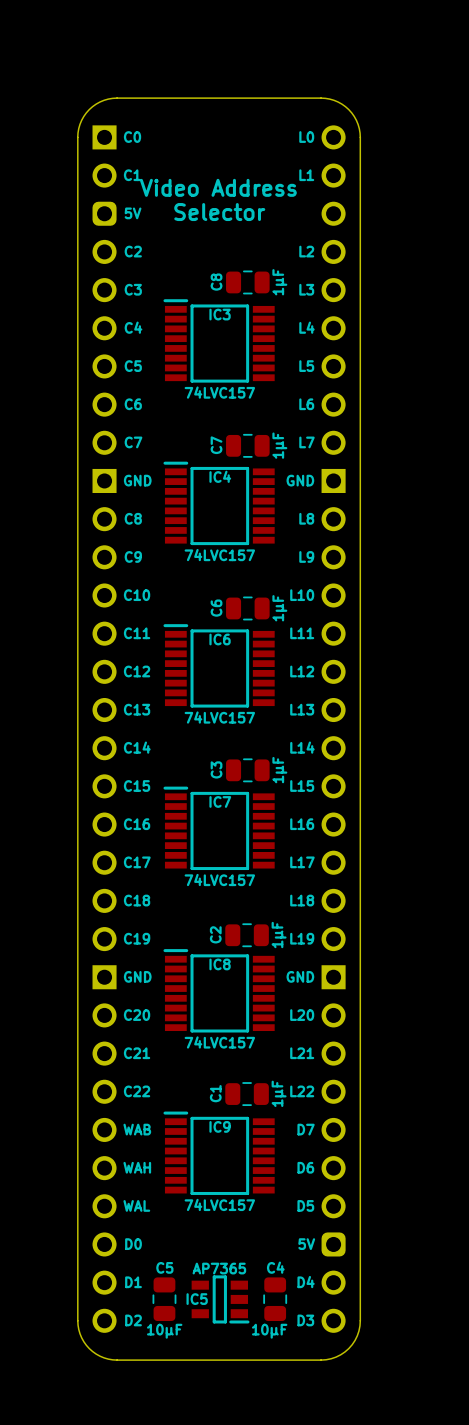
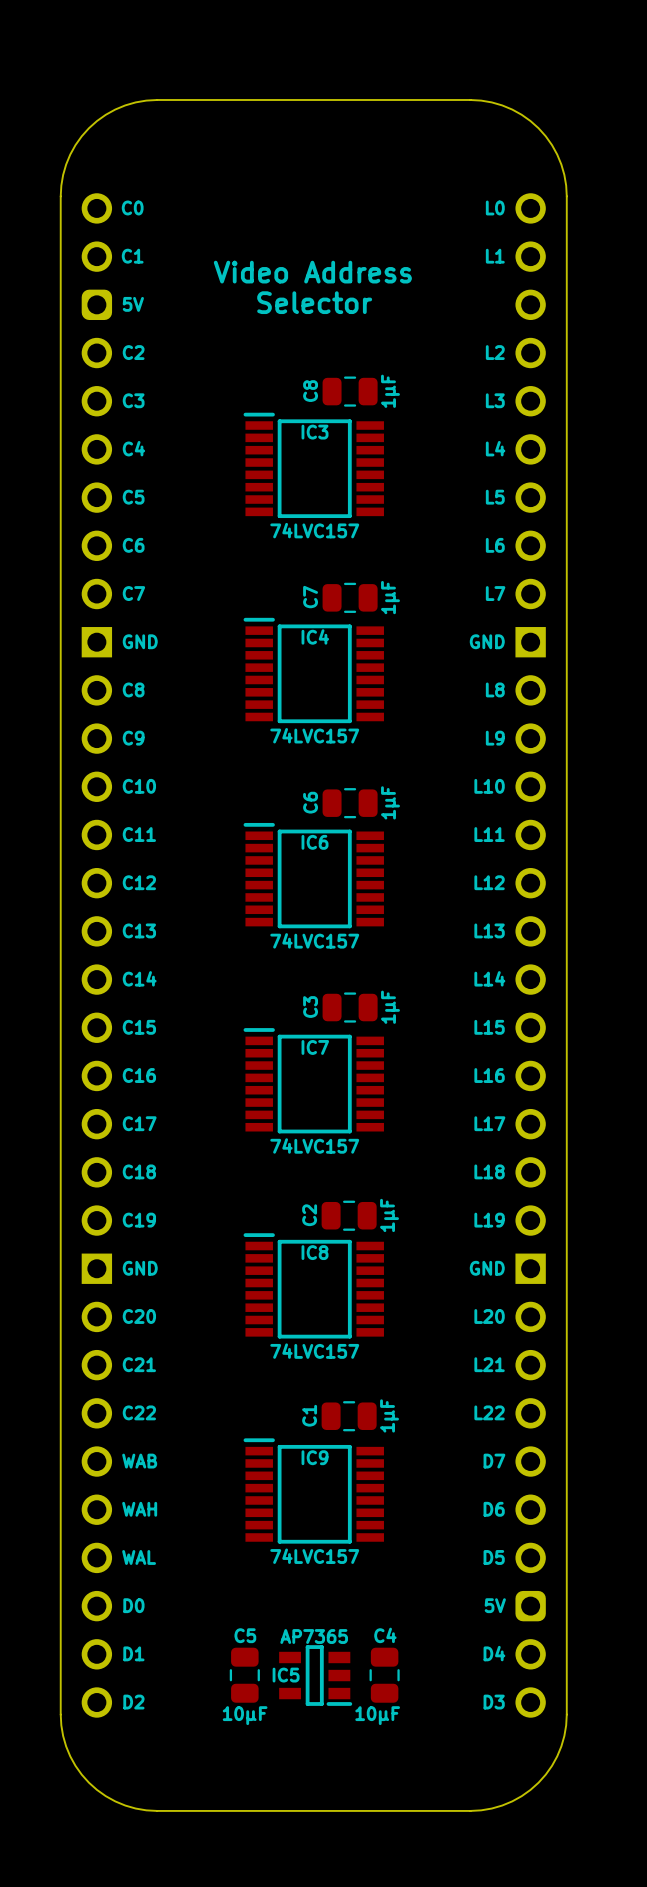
part footprint: [77, 97, 362, 1361] -> [59, 99, 568, 1812]
text position: C0 (132, 137) -> C0 (132, 207)
text position: L0 (306, 137) -> L0 (495, 207)
text position: C1 (132, 175) -> C1 (132, 256)
text position: L1 (306, 175) -> L1 (495, 256)
text position: 5V (133, 213) -> 5V (133, 304)
text position: C2 (133, 251) -> C2 (133, 352)
text position: L2 (306, 251) -> L2 (495, 352)
text position: C3 (133, 289) -> C3 (133, 400)
text position: L3 (306, 289) -> L3 (495, 400)
text position: C4 (133, 327) -> C4 (133, 448)
text position: L4 (306, 327) -> L4 (495, 448)
text position: C5 (133, 366) -> C5 (133, 497)
text position: L5 (306, 366) -> L5 (495, 497)
text position: C6 (133, 404) -> C6 (133, 545)
text position: L6 (306, 404) -> L6 (495, 545)
text position: C7 (133, 442) -> C7 (133, 593)
text position: L7 (306, 442) -> L7 (495, 593)
text position: GND (137, 480) -> GND (140, 641)
text position: GND (300, 480) -> GND (487, 641)
text position: C8 (133, 518) -> C8 (133, 689)
text position: L8 (306, 518) -> L8 (495, 689)
text position: C9 (133, 556) -> C9 (133, 738)
text position: L9 (306, 556) -> L9 (495, 738)
text position: C10 (137, 595) -> C10 (139, 786)
text position: L10 (302, 595) -> L10 (489, 786)
text position: C11 (137, 633) -> C11 (139, 834)
text position: L11 (302, 633) -> L11 (489, 834)
text position: C12 (137, 671) -> C12 (139, 882)
text position: L12 (302, 671) -> L12 (489, 882)
text position: C13 (137, 709) -> C13 (139, 930)
text position: L13 (302, 709) -> L13 (489, 930)
text position: C14 (137, 747) -> C14 (139, 978)
text position: L14 (302, 747) -> L14 (489, 978)
text position: C15 (137, 786) -> C15 (139, 1027)
text position: L15 (302, 786) -> L15 (489, 1027)
text position: C16 (137, 824) -> C16 (139, 1075)
text position: L16 (302, 824) -> L16 (489, 1075)
text position: C17 (137, 862) -> C17 (139, 1123)
text position: L17 (302, 862) -> L17 (489, 1123)
text position: C18 (137, 900) -> C18 (139, 1171)
text position: L18 (302, 900) -> L18 (489, 1171)
text position: C19 (137, 938) -> C19 (139, 1220)
text position: L19 (302, 938) -> L19 (489, 1220)
text position: GND (137, 976) -> GND (140, 1268)
text position: GND (300, 976) -> GND (487, 1268)
text position: C20 (137, 1015) -> C20 (139, 1316)
text position: L20 (302, 1015) -> L20 (489, 1316)
text position: C21 (137, 1053) -> C21 (139, 1364)
text position: L21 (302, 1053) -> L21 (489, 1364)
text position: C22 (137, 1091) -> C22 (139, 1412)
text position: L22 (302, 1091) -> L22 (489, 1412)
text position: WAB (137, 1129) -> WAB (139, 1461)
text position: D7 (306, 1129) -> D7 (494, 1461)
text position: WAH (137, 1167) -> WAH (139, 1509)
text position: D6 (305, 1167) -> D6 (494, 1509)
text position: WAL (136, 1205) -> WAL (139, 1557)
text position: D5 (305, 1205) -> D5 (494, 1557)
text position: D0 (133, 1244) -> D0 (133, 1605)
text position: 5V (306, 1244) -> 5V (495, 1605)
text position: D1 (133, 1282) -> D1 (133, 1653)
text position: D4 (306, 1282) -> D4 (494, 1653)
text position: D2 (133, 1320) -> D2 (133, 1702)
text position: D3 (305, 1320) -> D3 (494, 1702)

